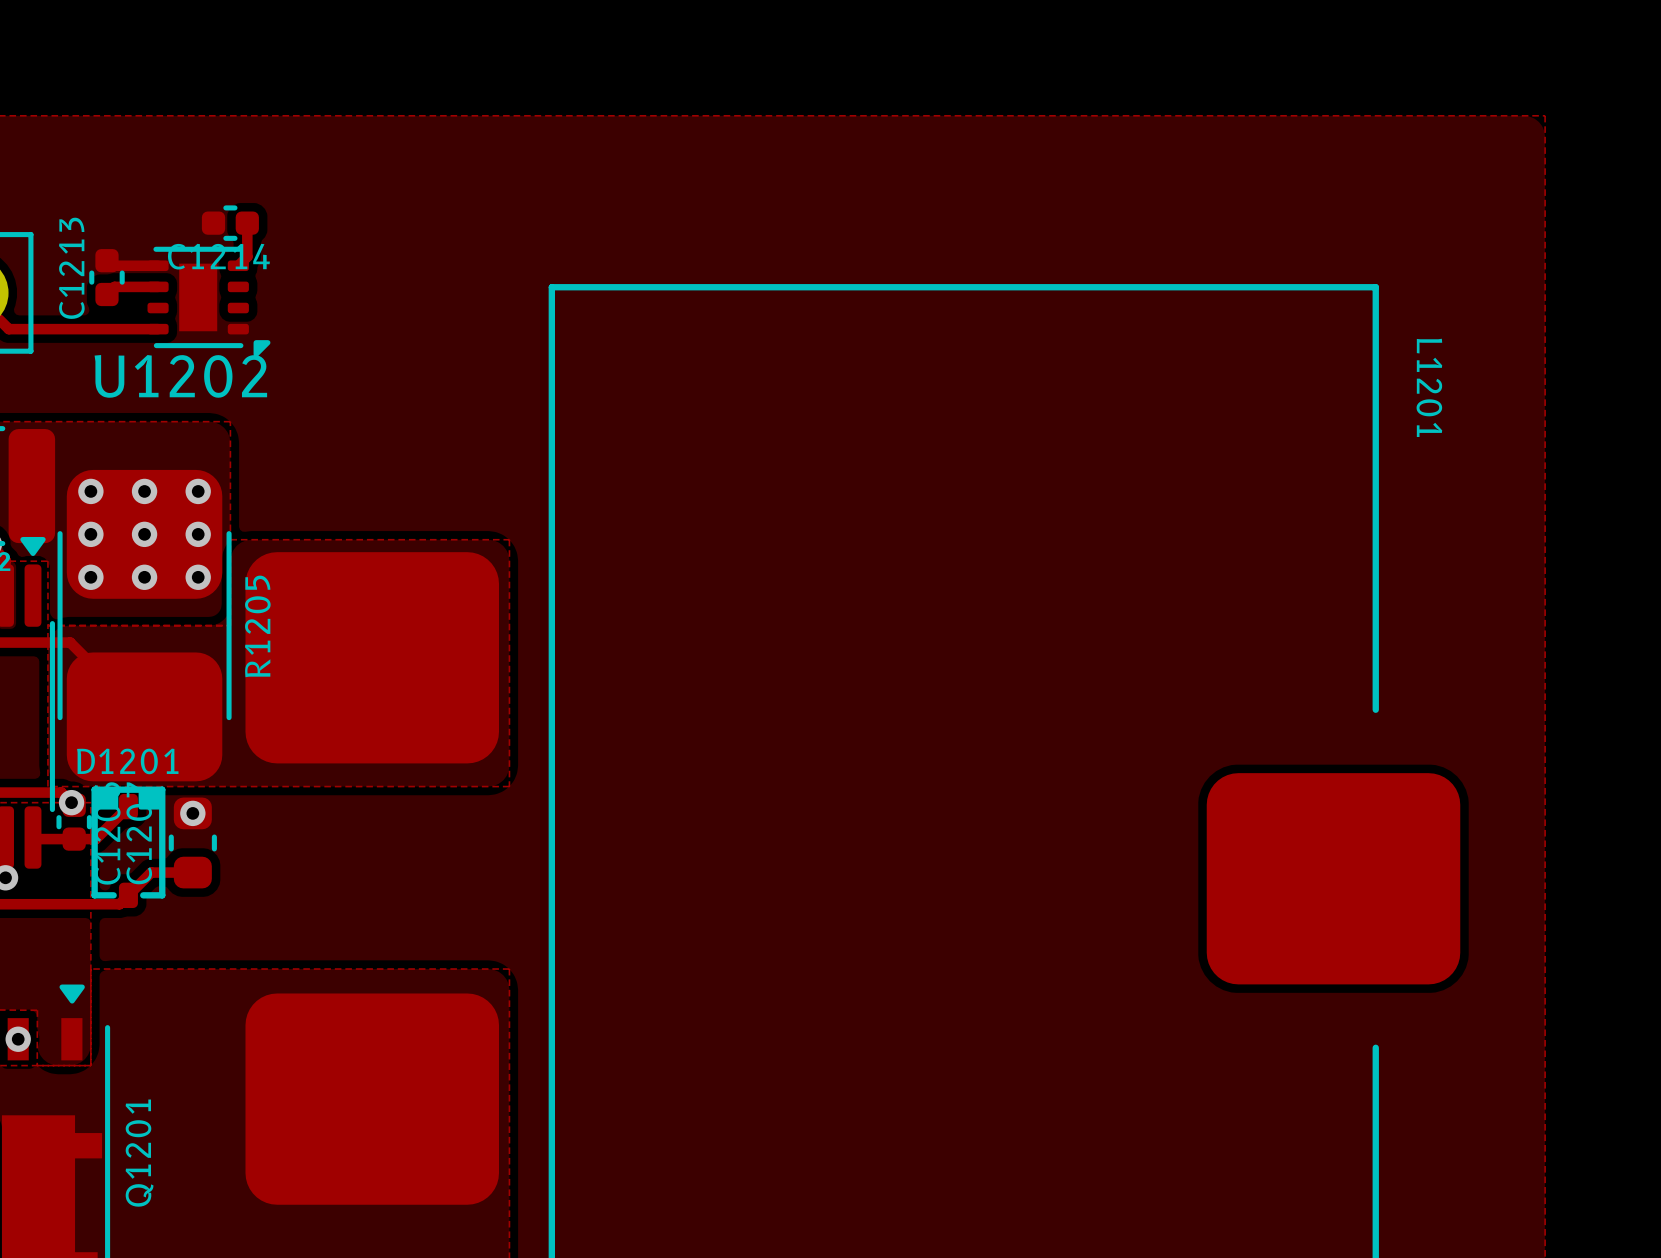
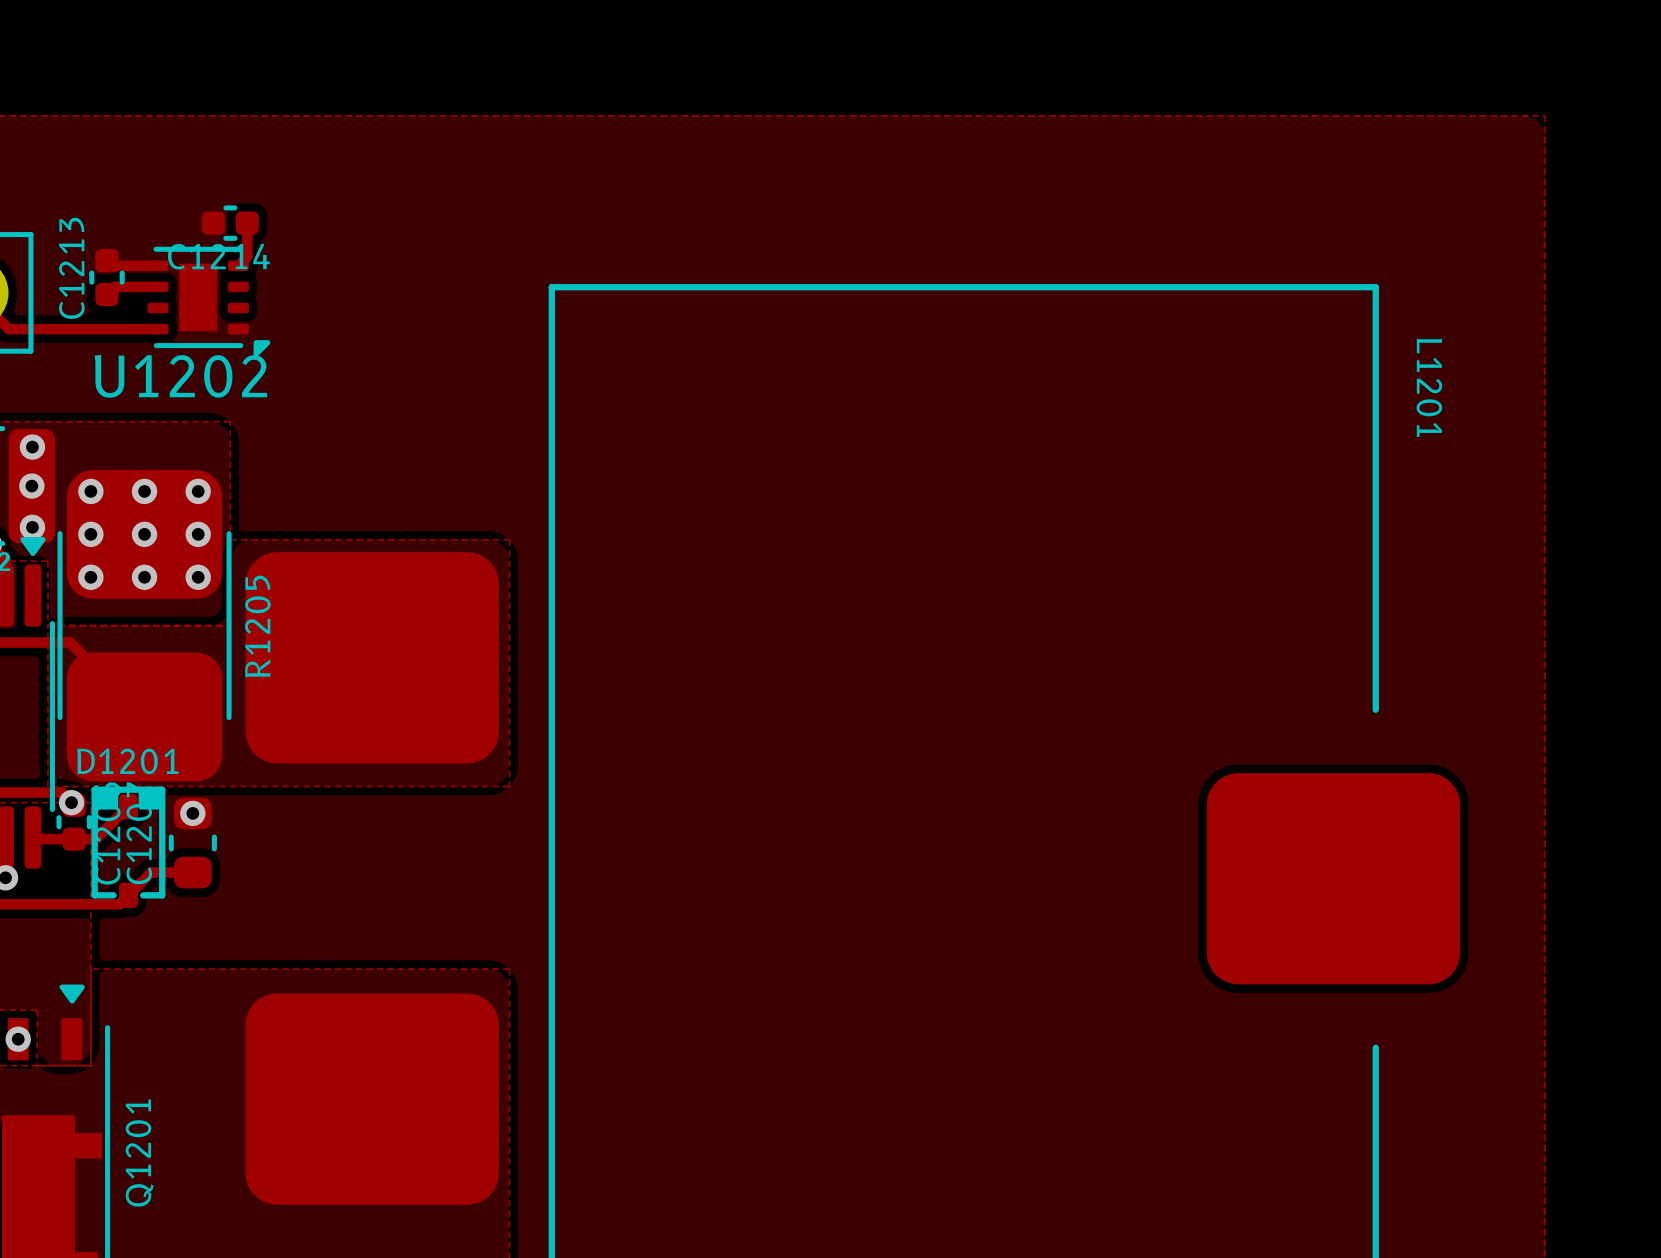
via: none -> (32, 447)
via: none -> (31, 486)
via: none -> (32, 527)

